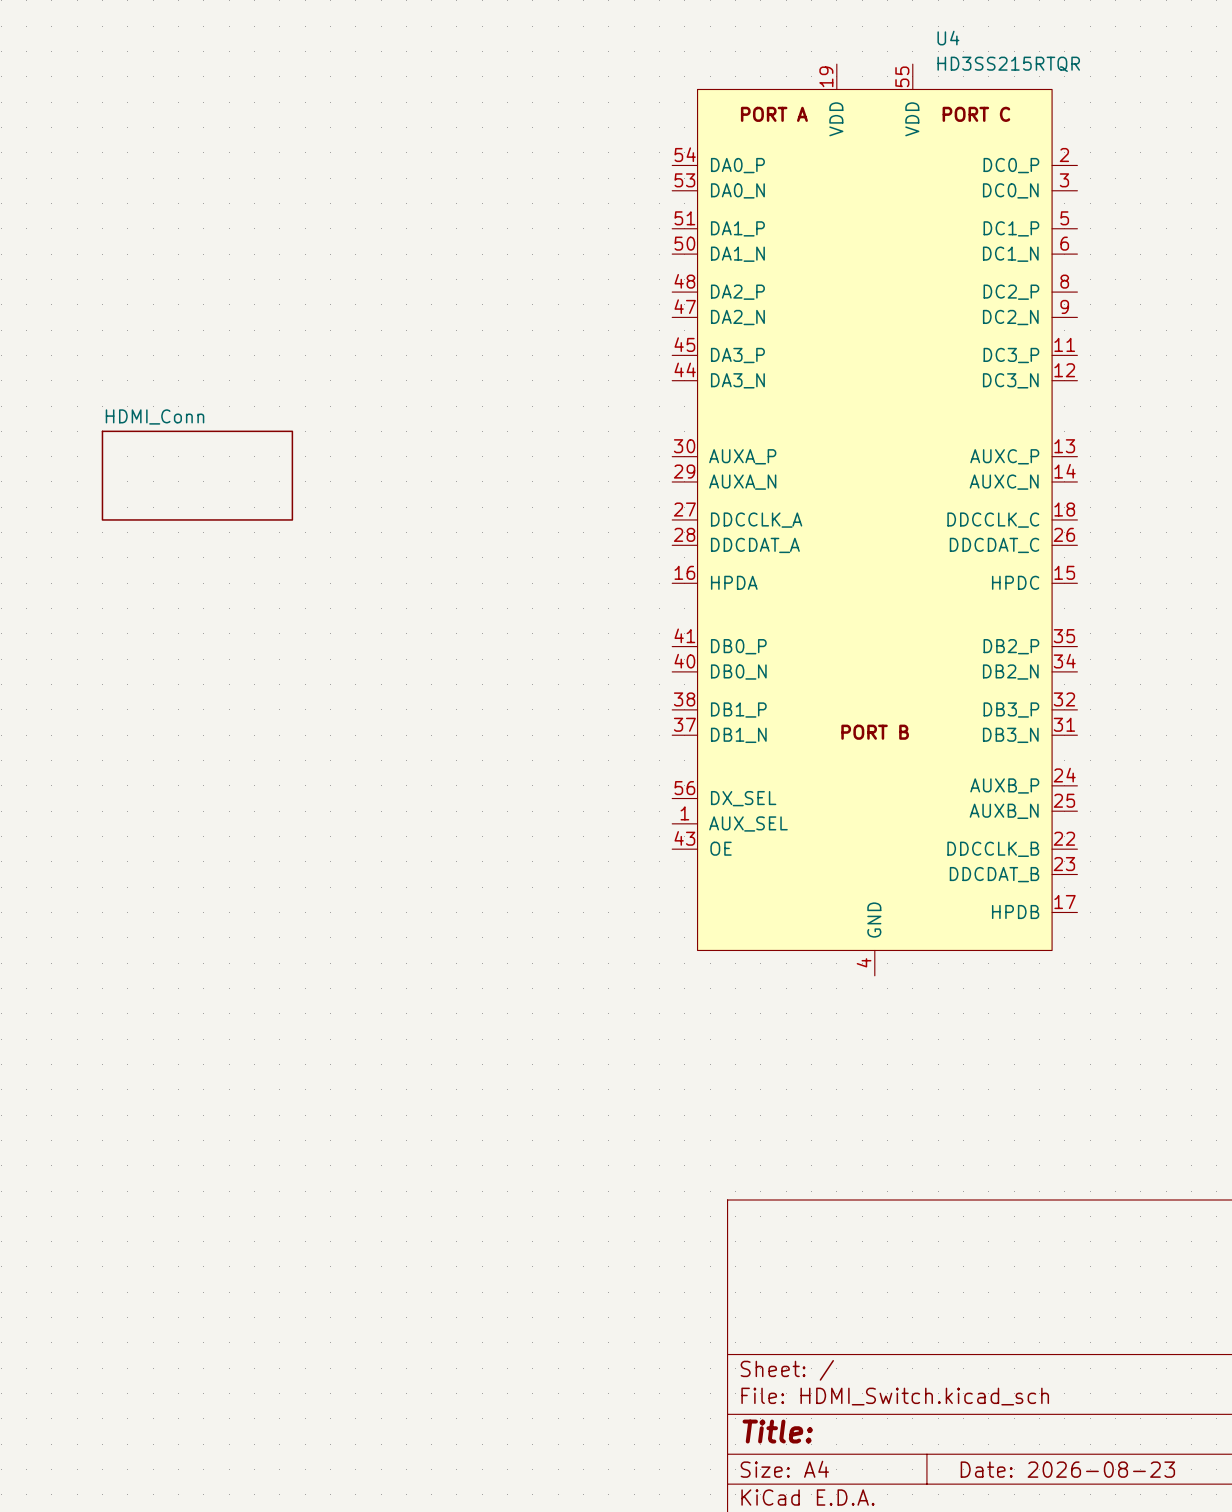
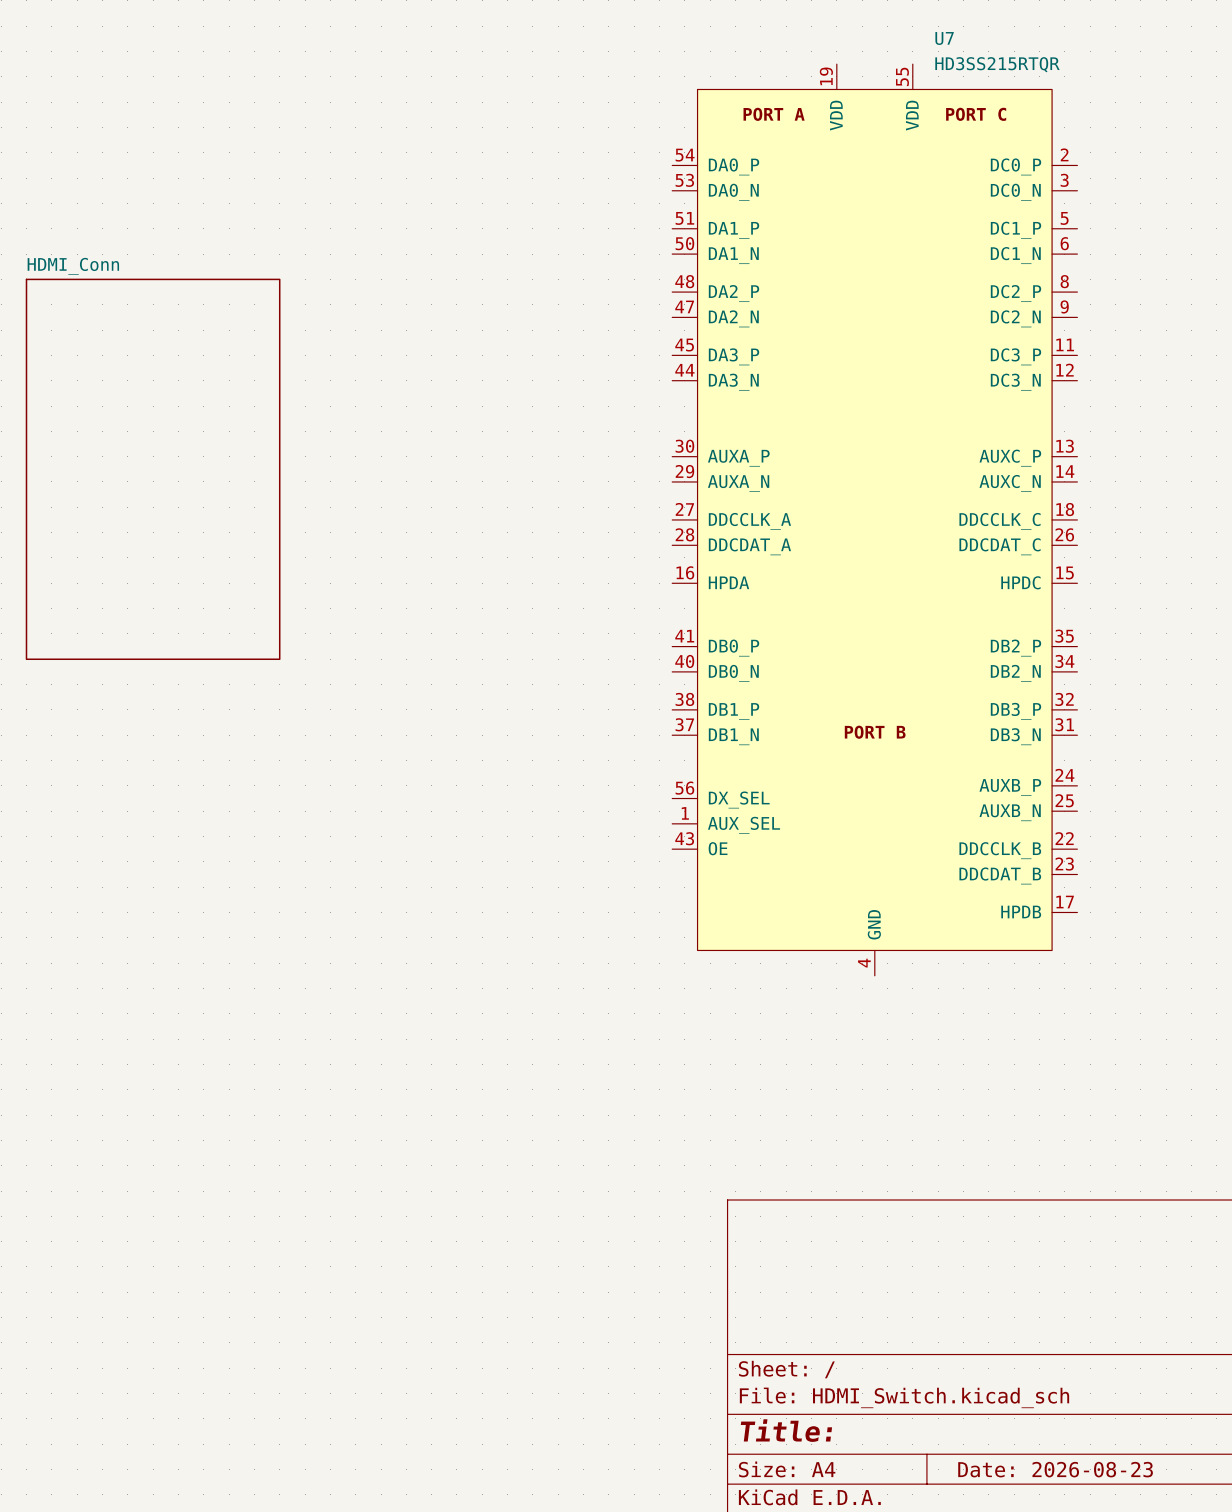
U4 name: U4 (948, 38) -> U7 (944, 38)
sheet HDMI_Conn: none -> (153, 469)
sheet HDMI_Conn: (197, 475) -> none

